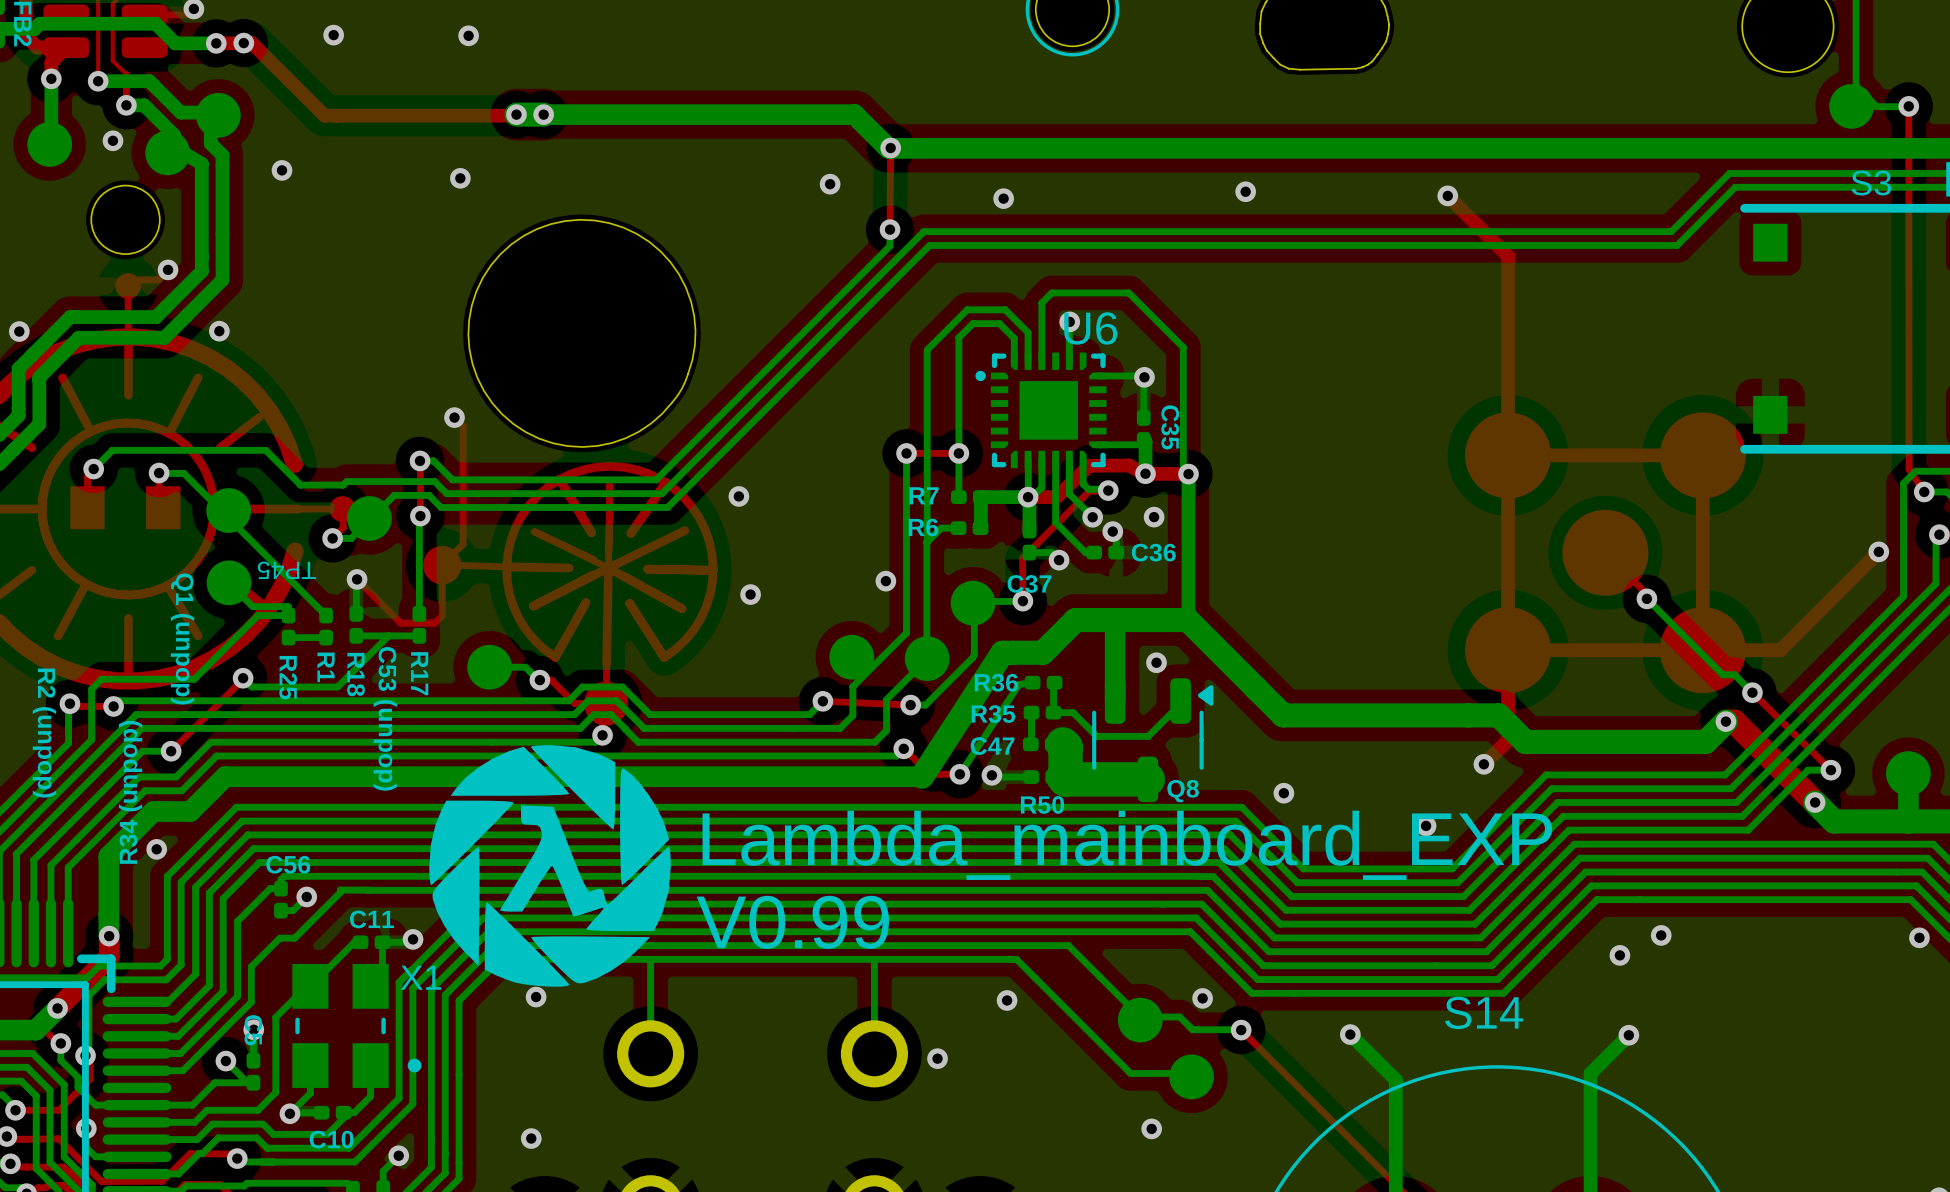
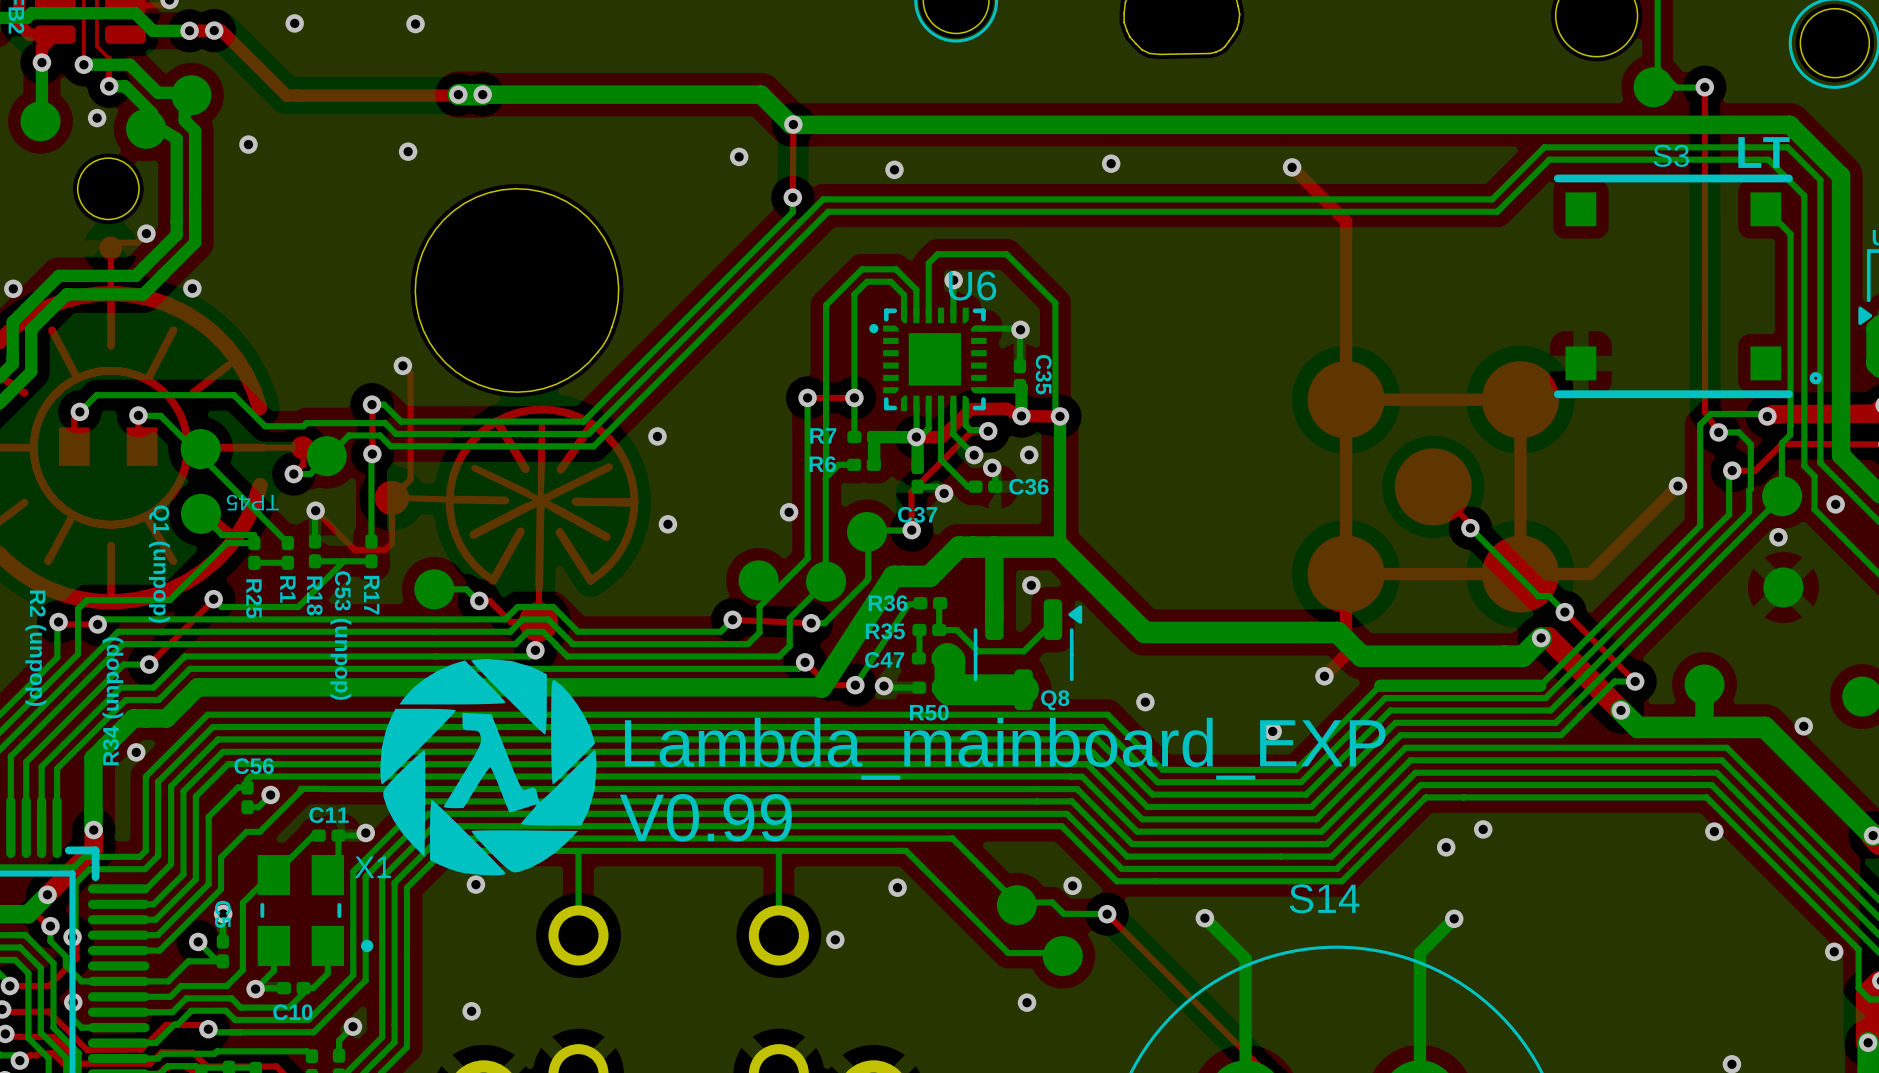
bottom track width: thin (1725, 774) (1546, 774) -> thick (1540, 685) (1380, 685)

